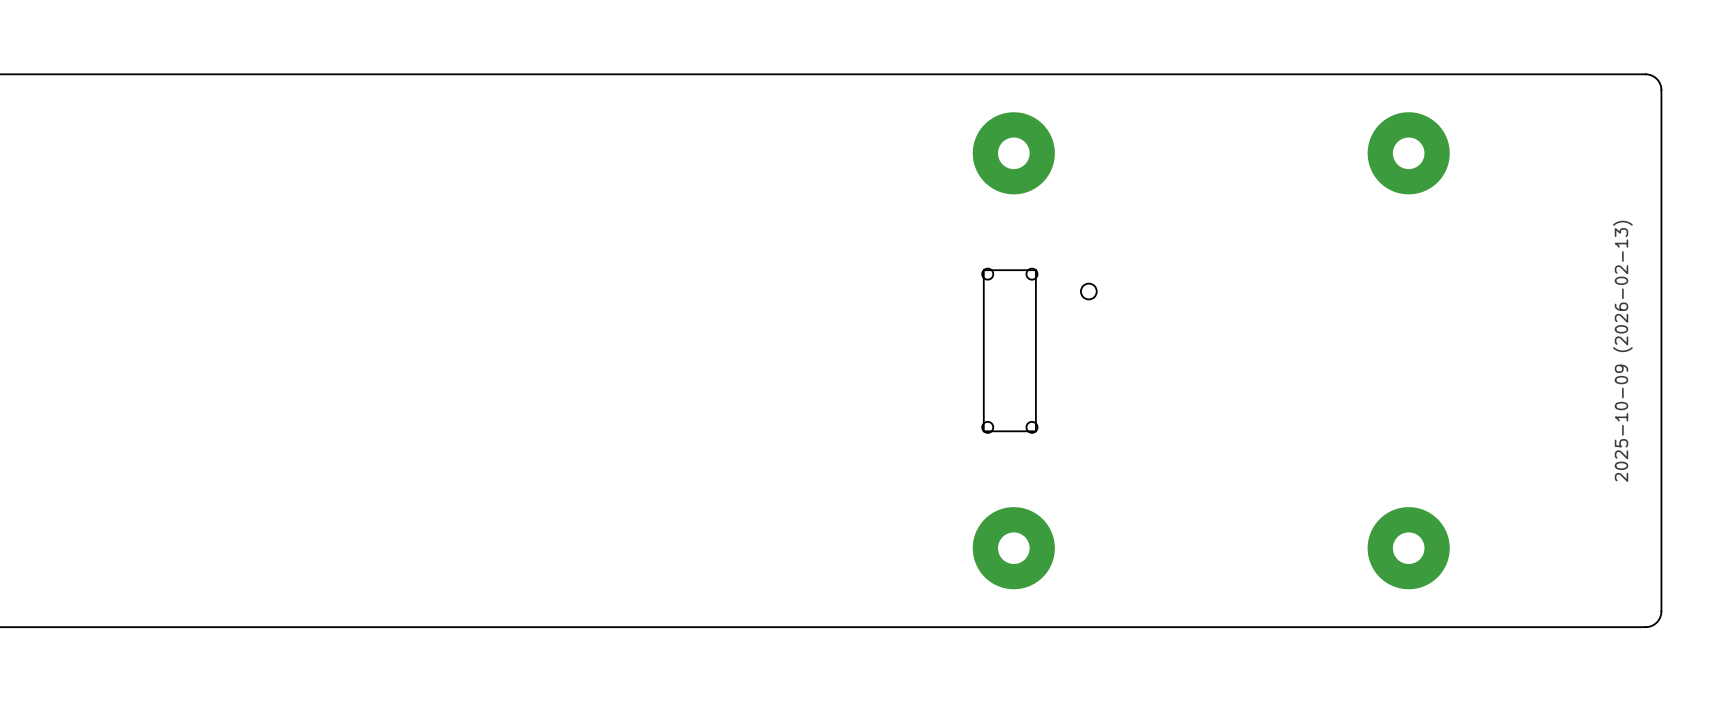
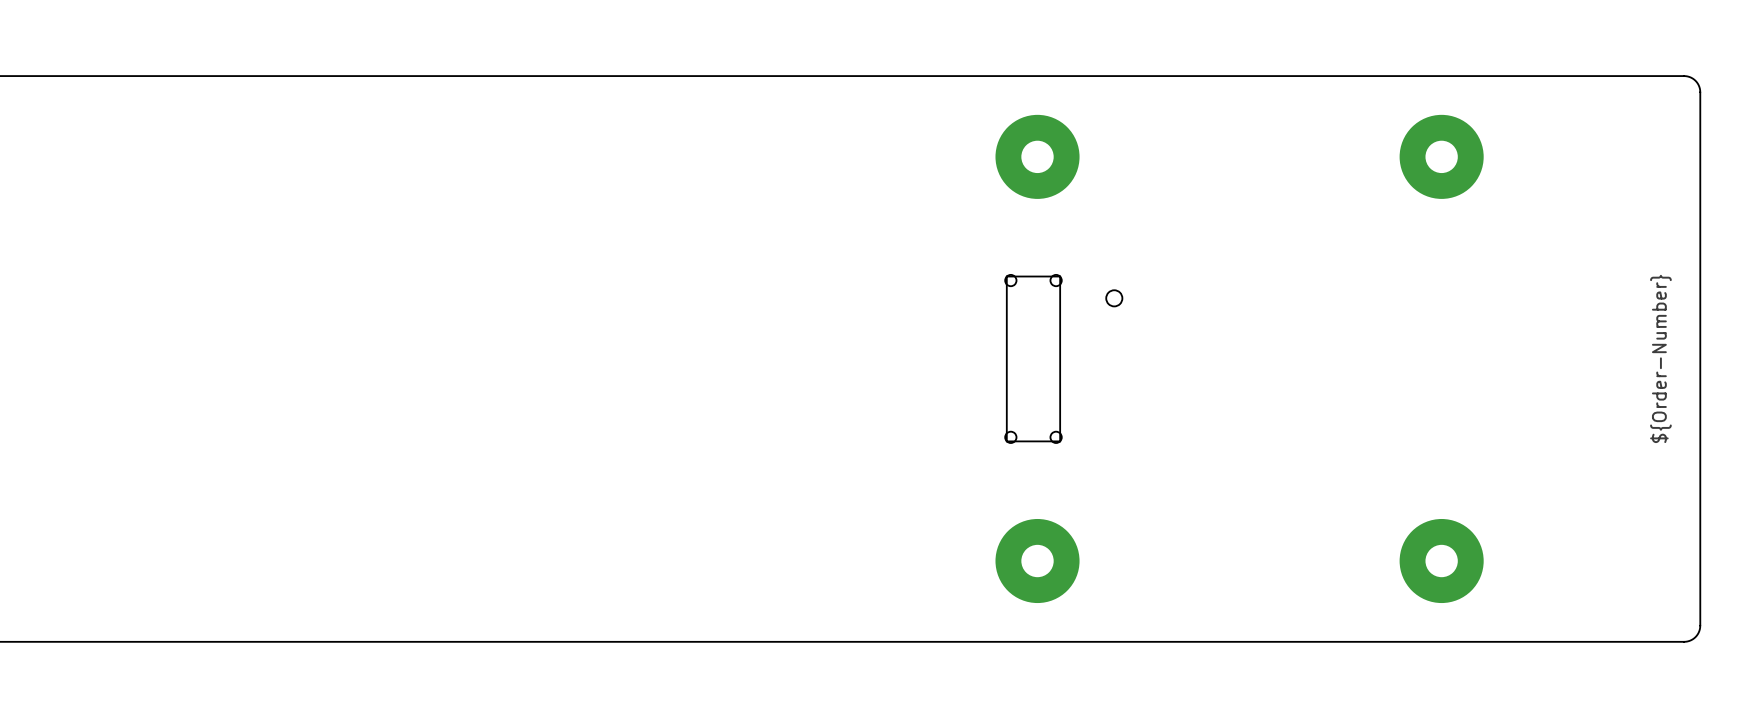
drawing shape: [1613, 220, 1633, 482] -> [1650, 274, 1672, 444]

